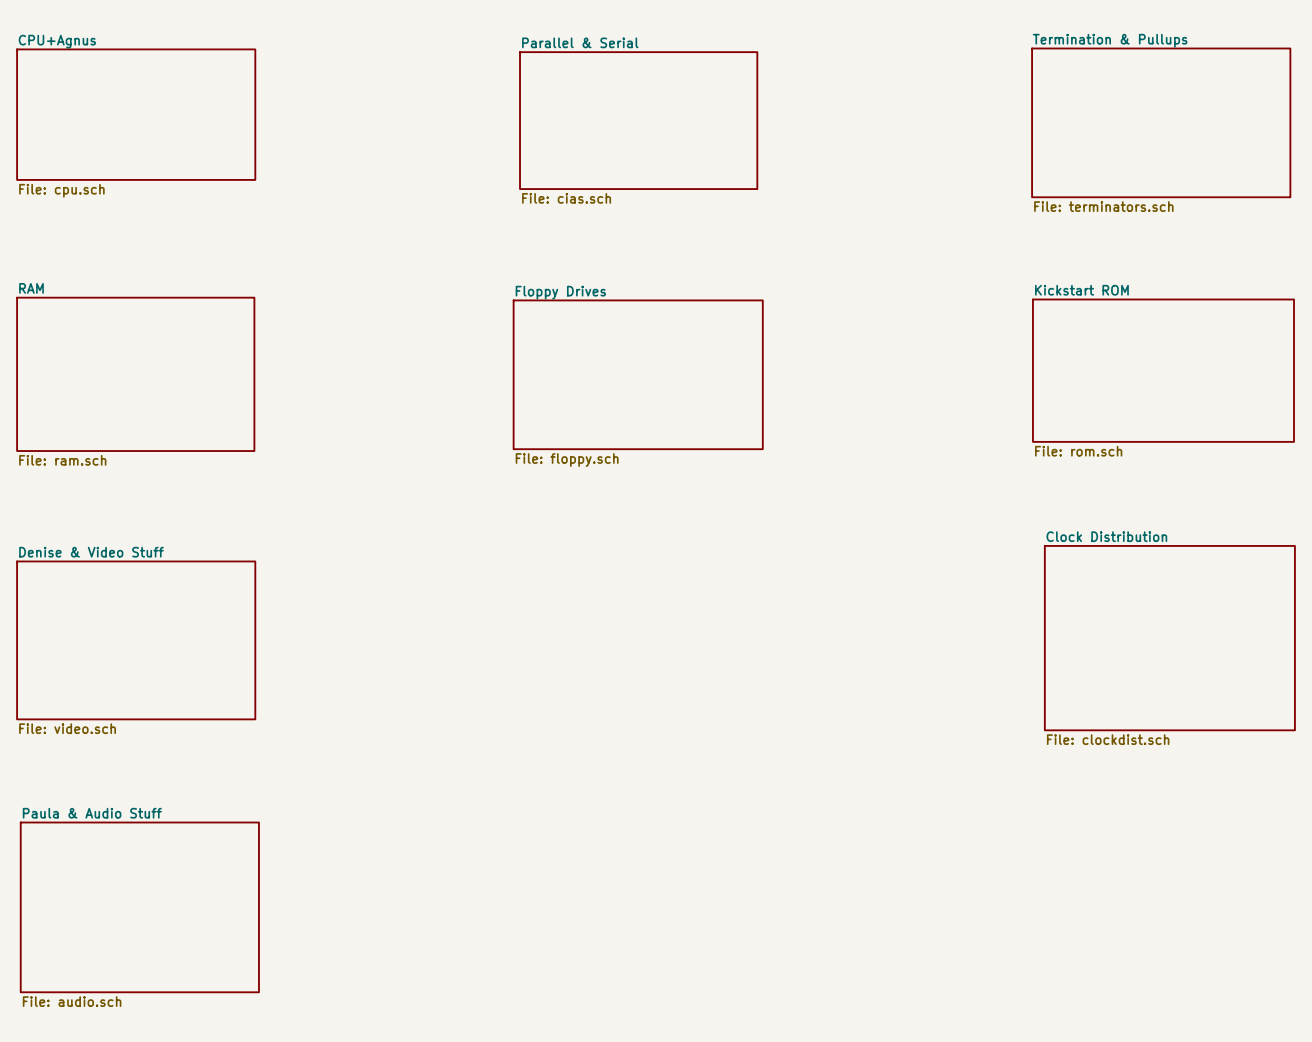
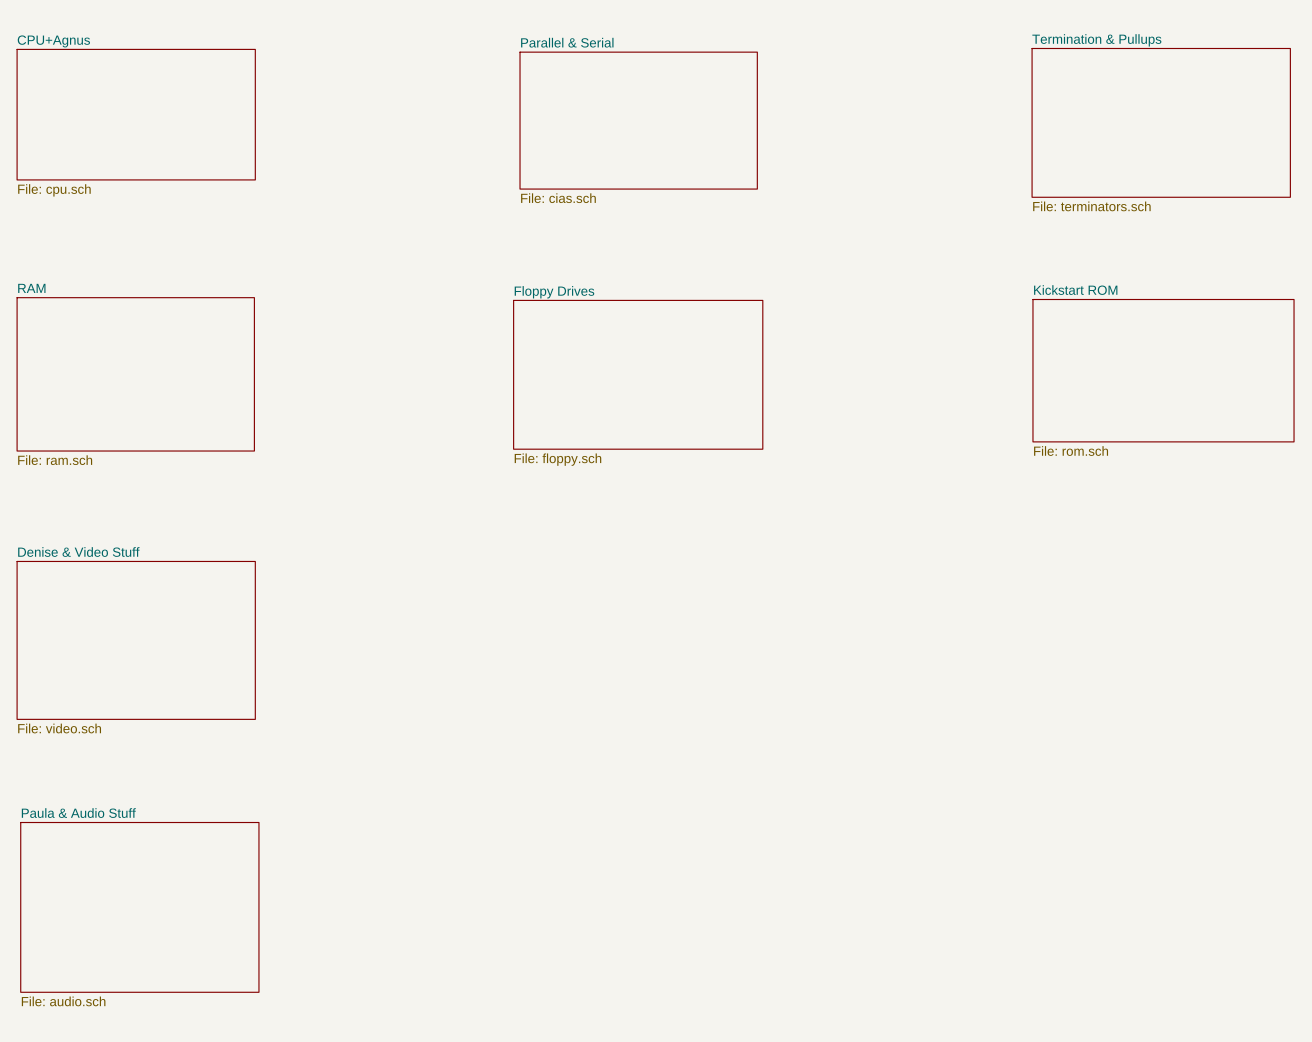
sheet Clock Distribution: File: clockdist.sch (1169, 638) -> none

